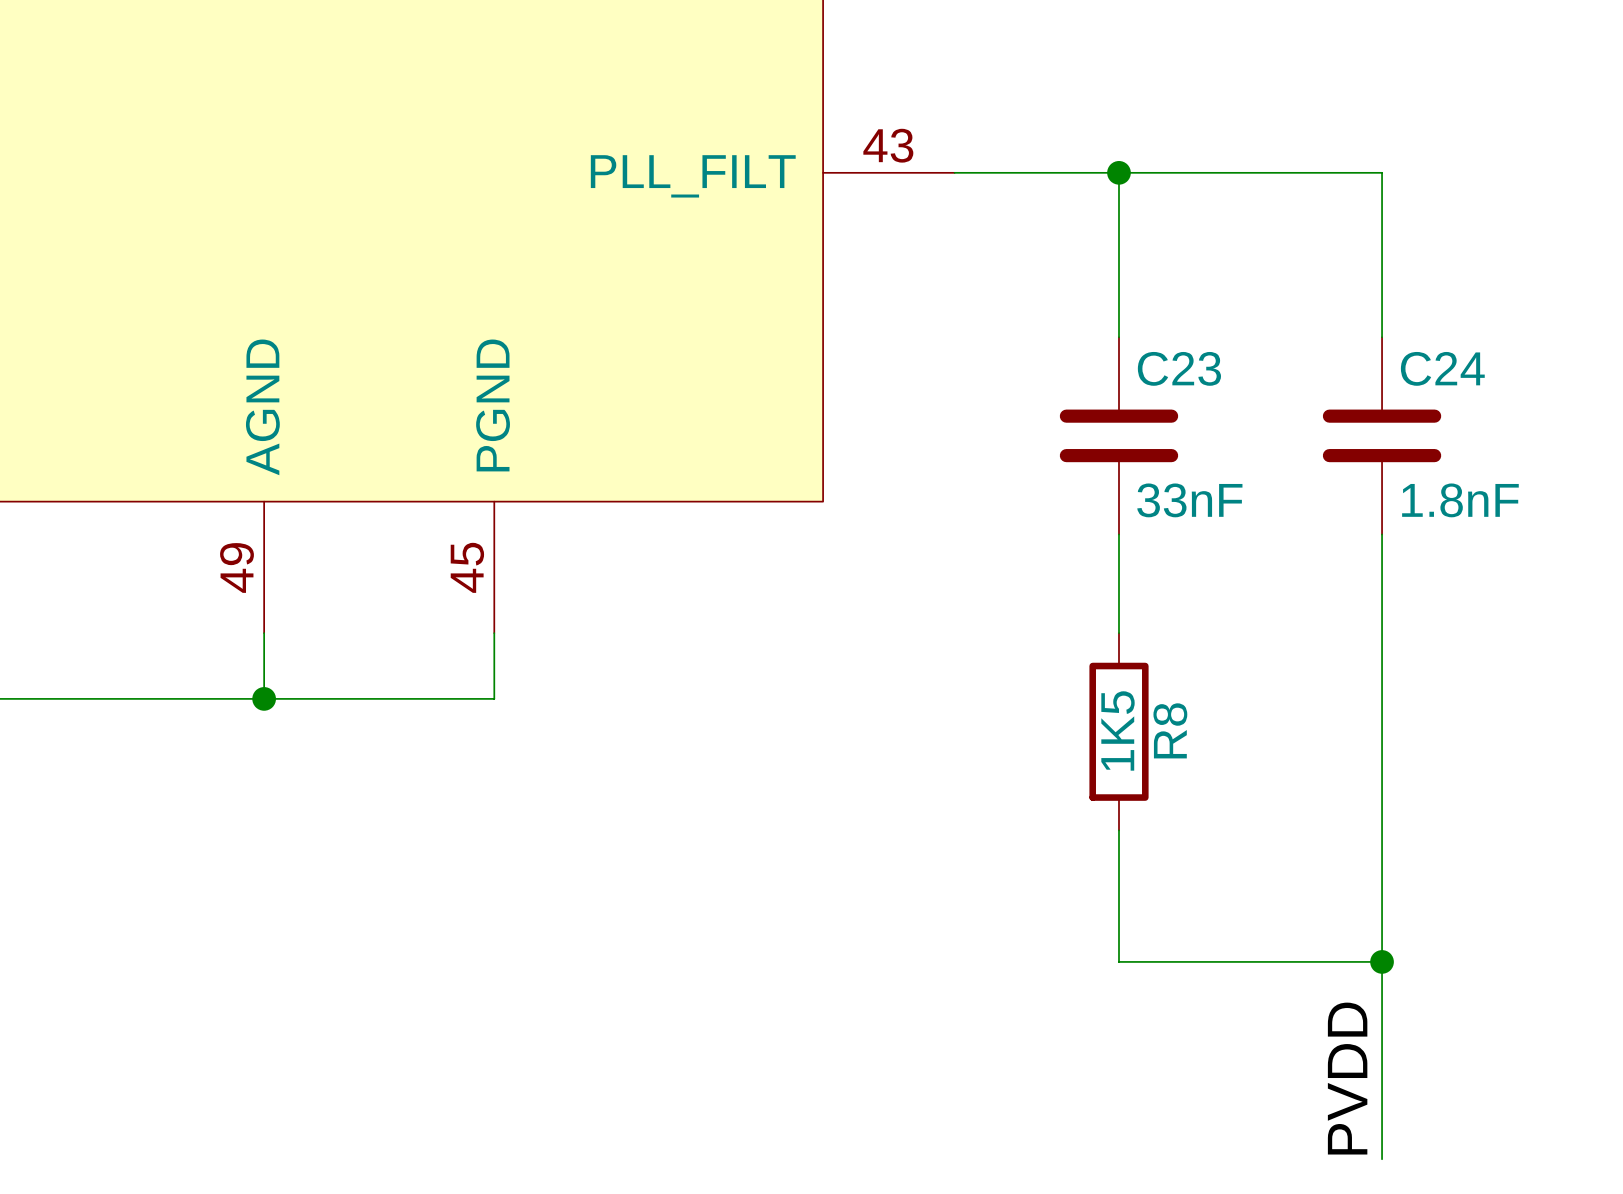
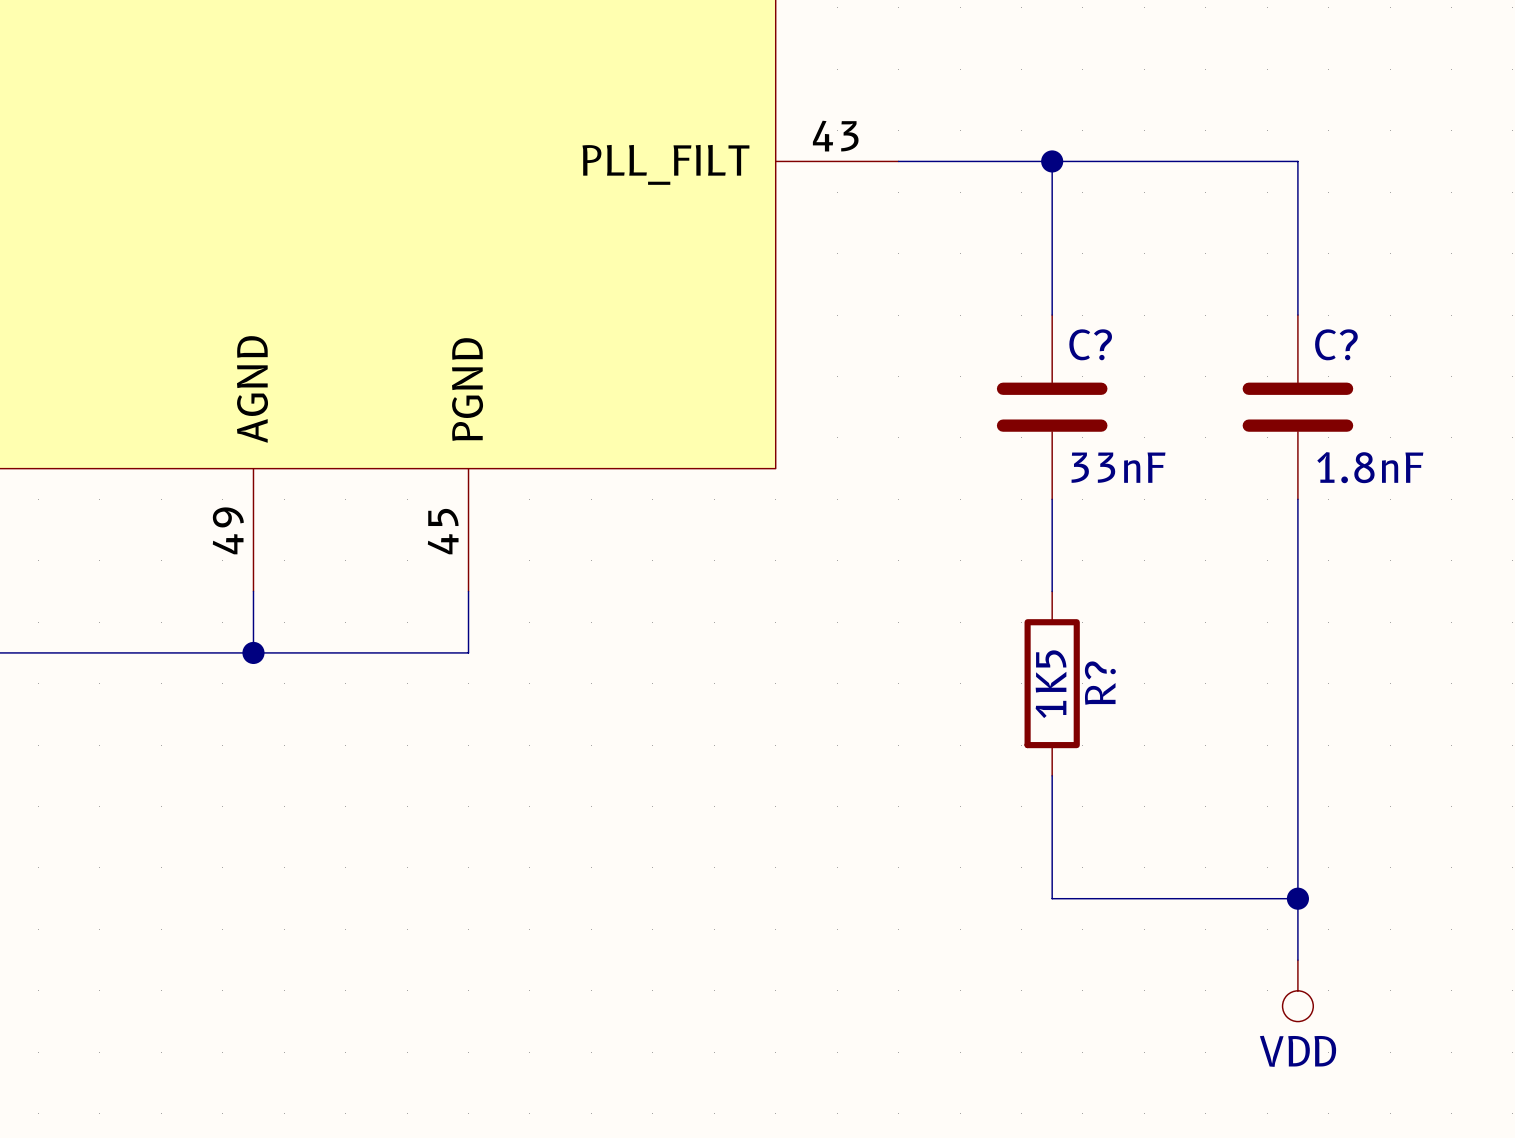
C23 name: C23 (1179, 368) -> C? (1090, 344)
C24 name: C24 (1442, 368) -> C? (1336, 344)
R8 name: R8 (1170, 730) -> R? (1100, 683)
wire: (1382, 1027) (1382, 1159) -> none
power symbol: none -> VDD (1297, 990)
label: PVDD (1347, 1078) -> none

